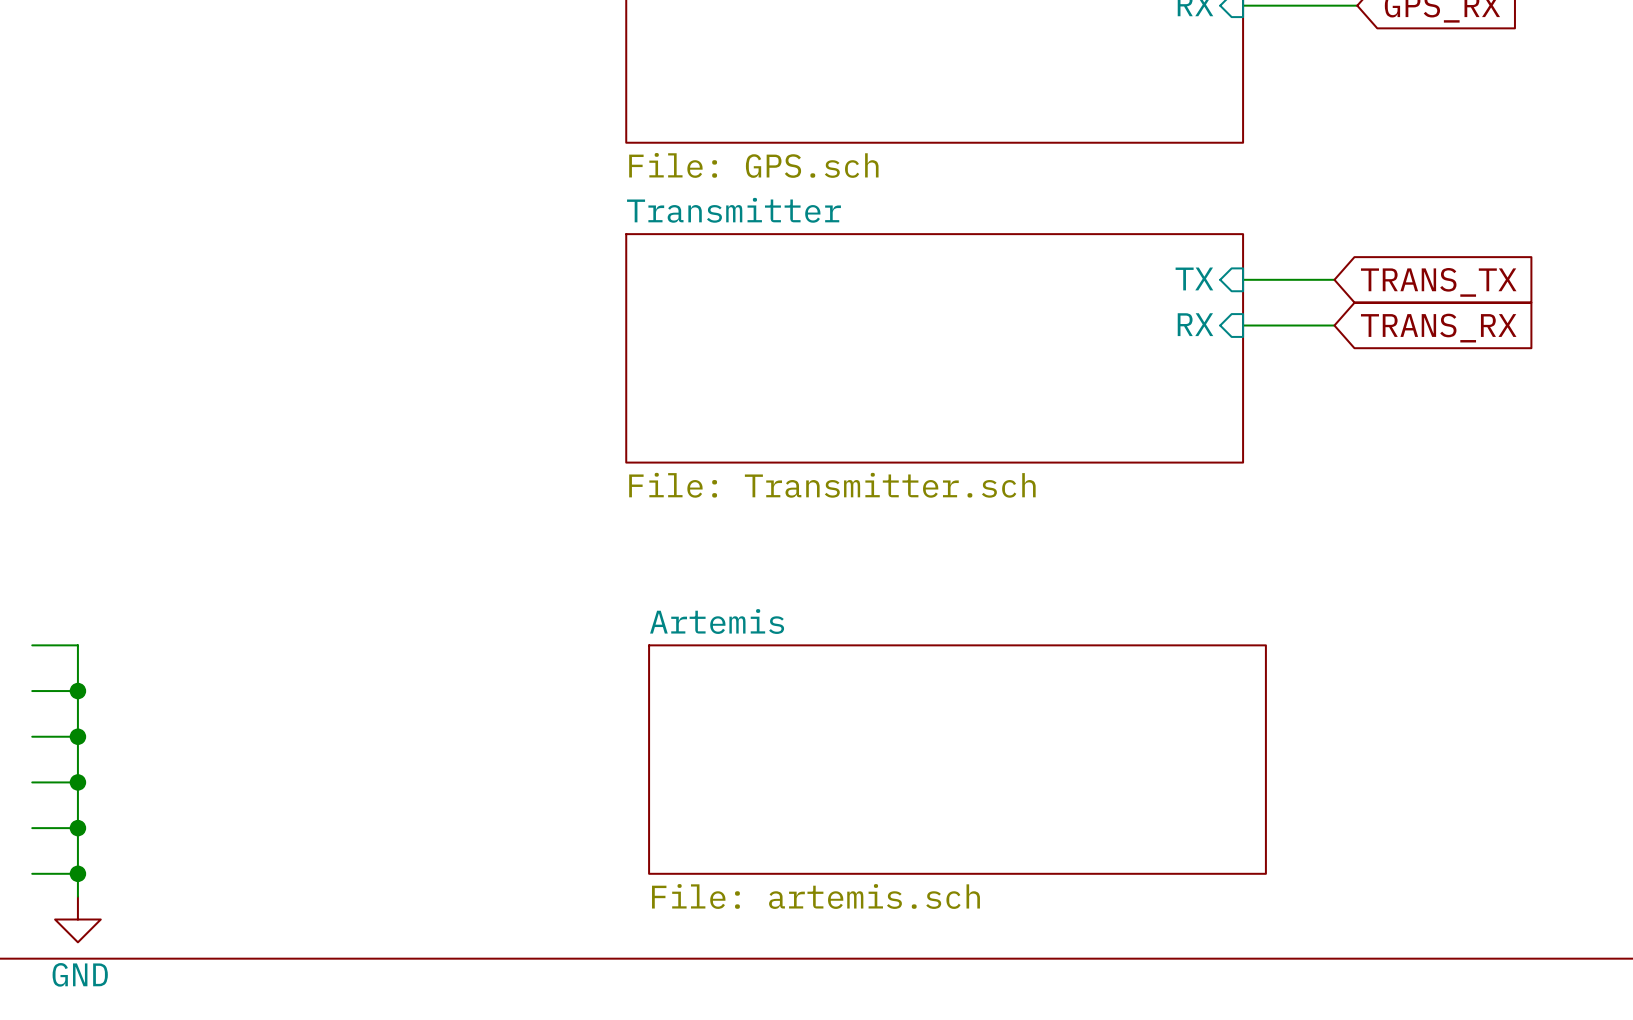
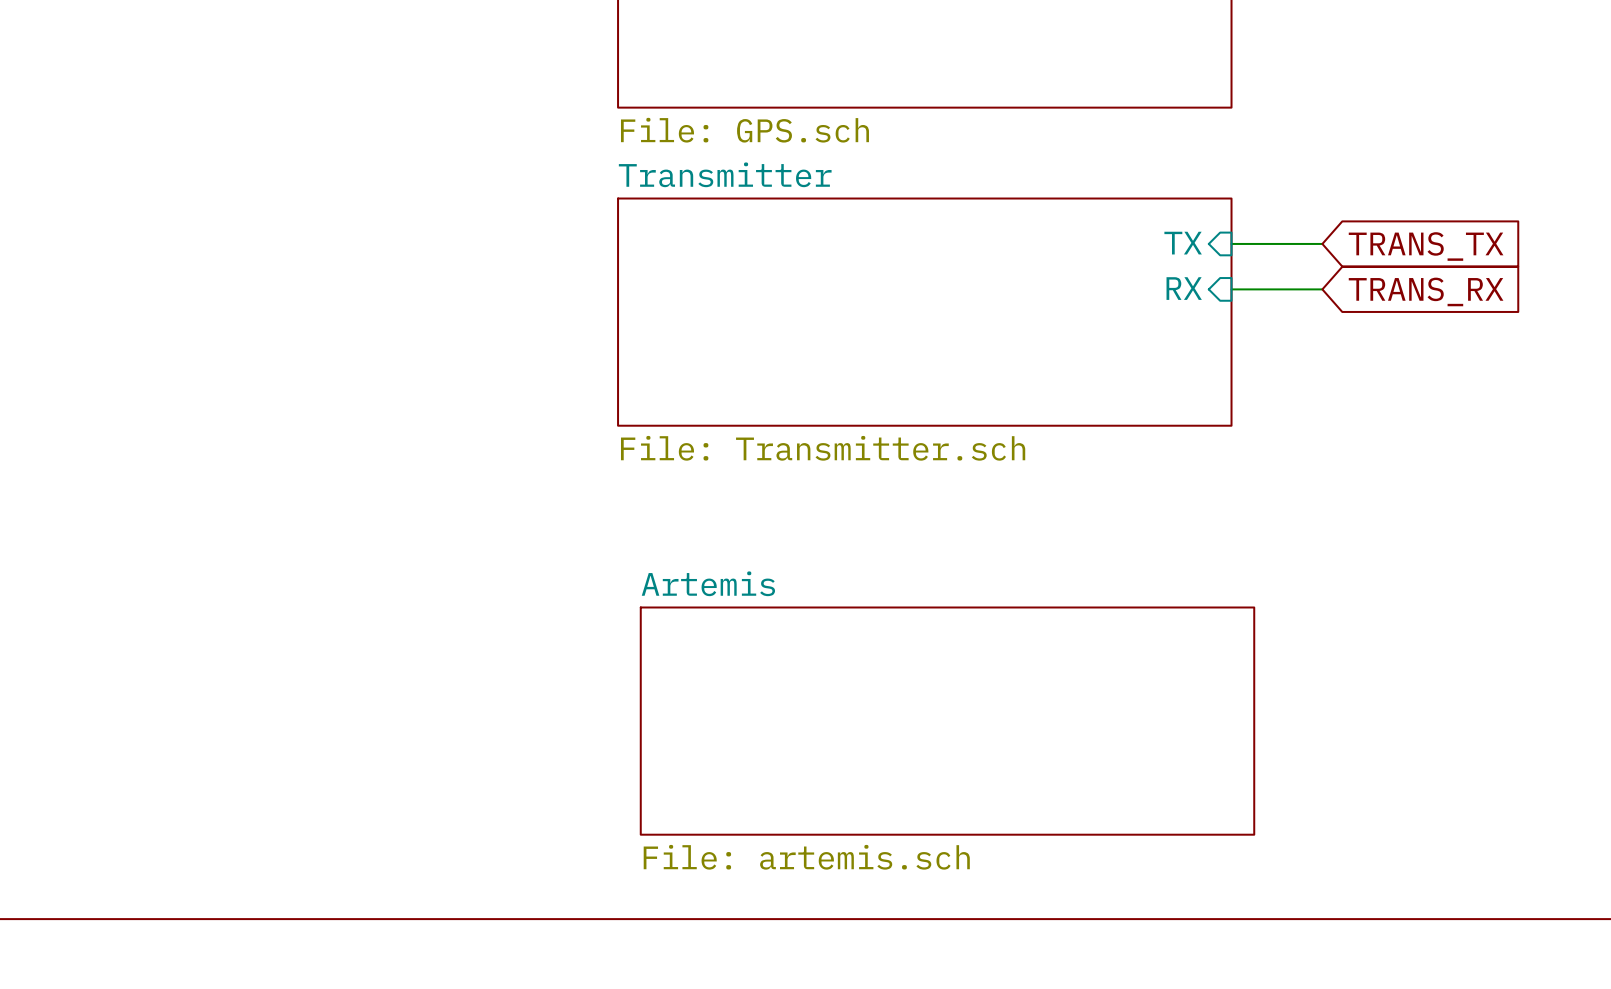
wire: (32, 645) (77, 645) (77, 896) -> none
wire: (32, 691) (77, 691) -> none
junction: (77, 691) -> none
wire: (32, 736) (77, 736) -> none
junction: (77, 736) -> none
wire: (32, 782) (77, 782) -> none
junction: (77, 782) -> none
wire: (32, 828) (77, 828) -> none
junction: (77, 828) -> none
wire: (32, 873) (77, 873) -> none
junction: (77, 873) -> none
power symbol: GND (77, 919) -> none

